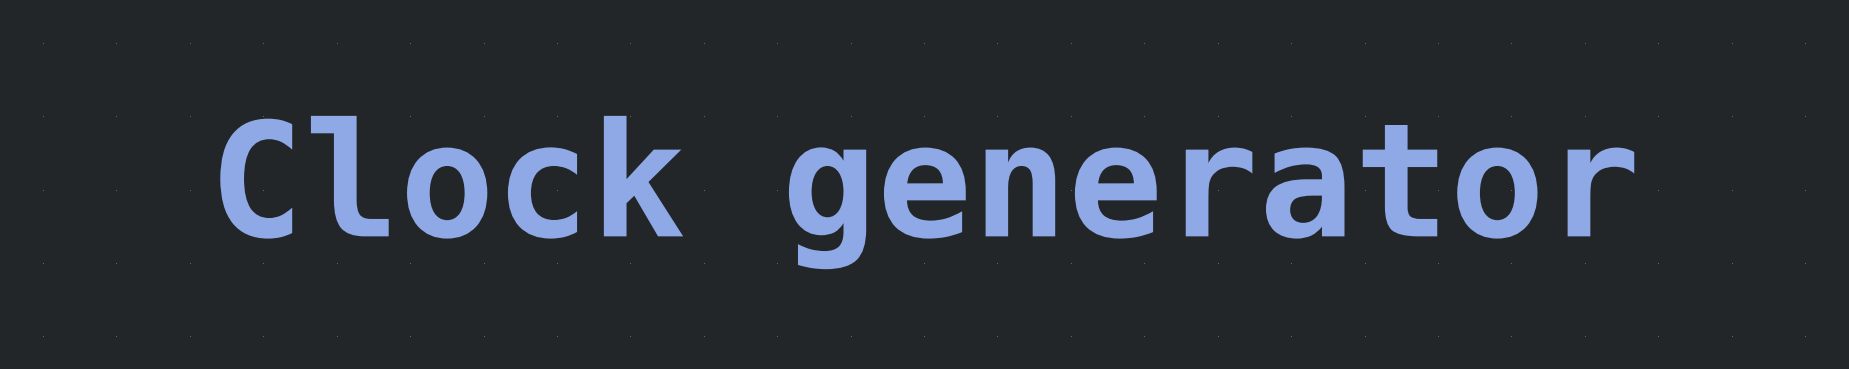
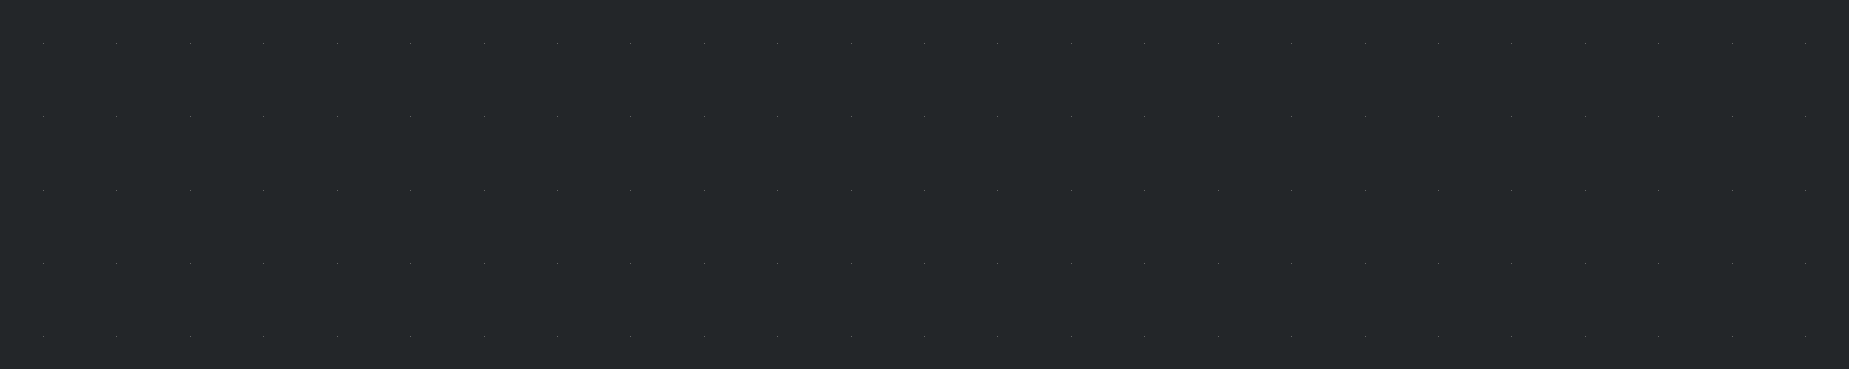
text: Clock generator (927, 192) -> none

